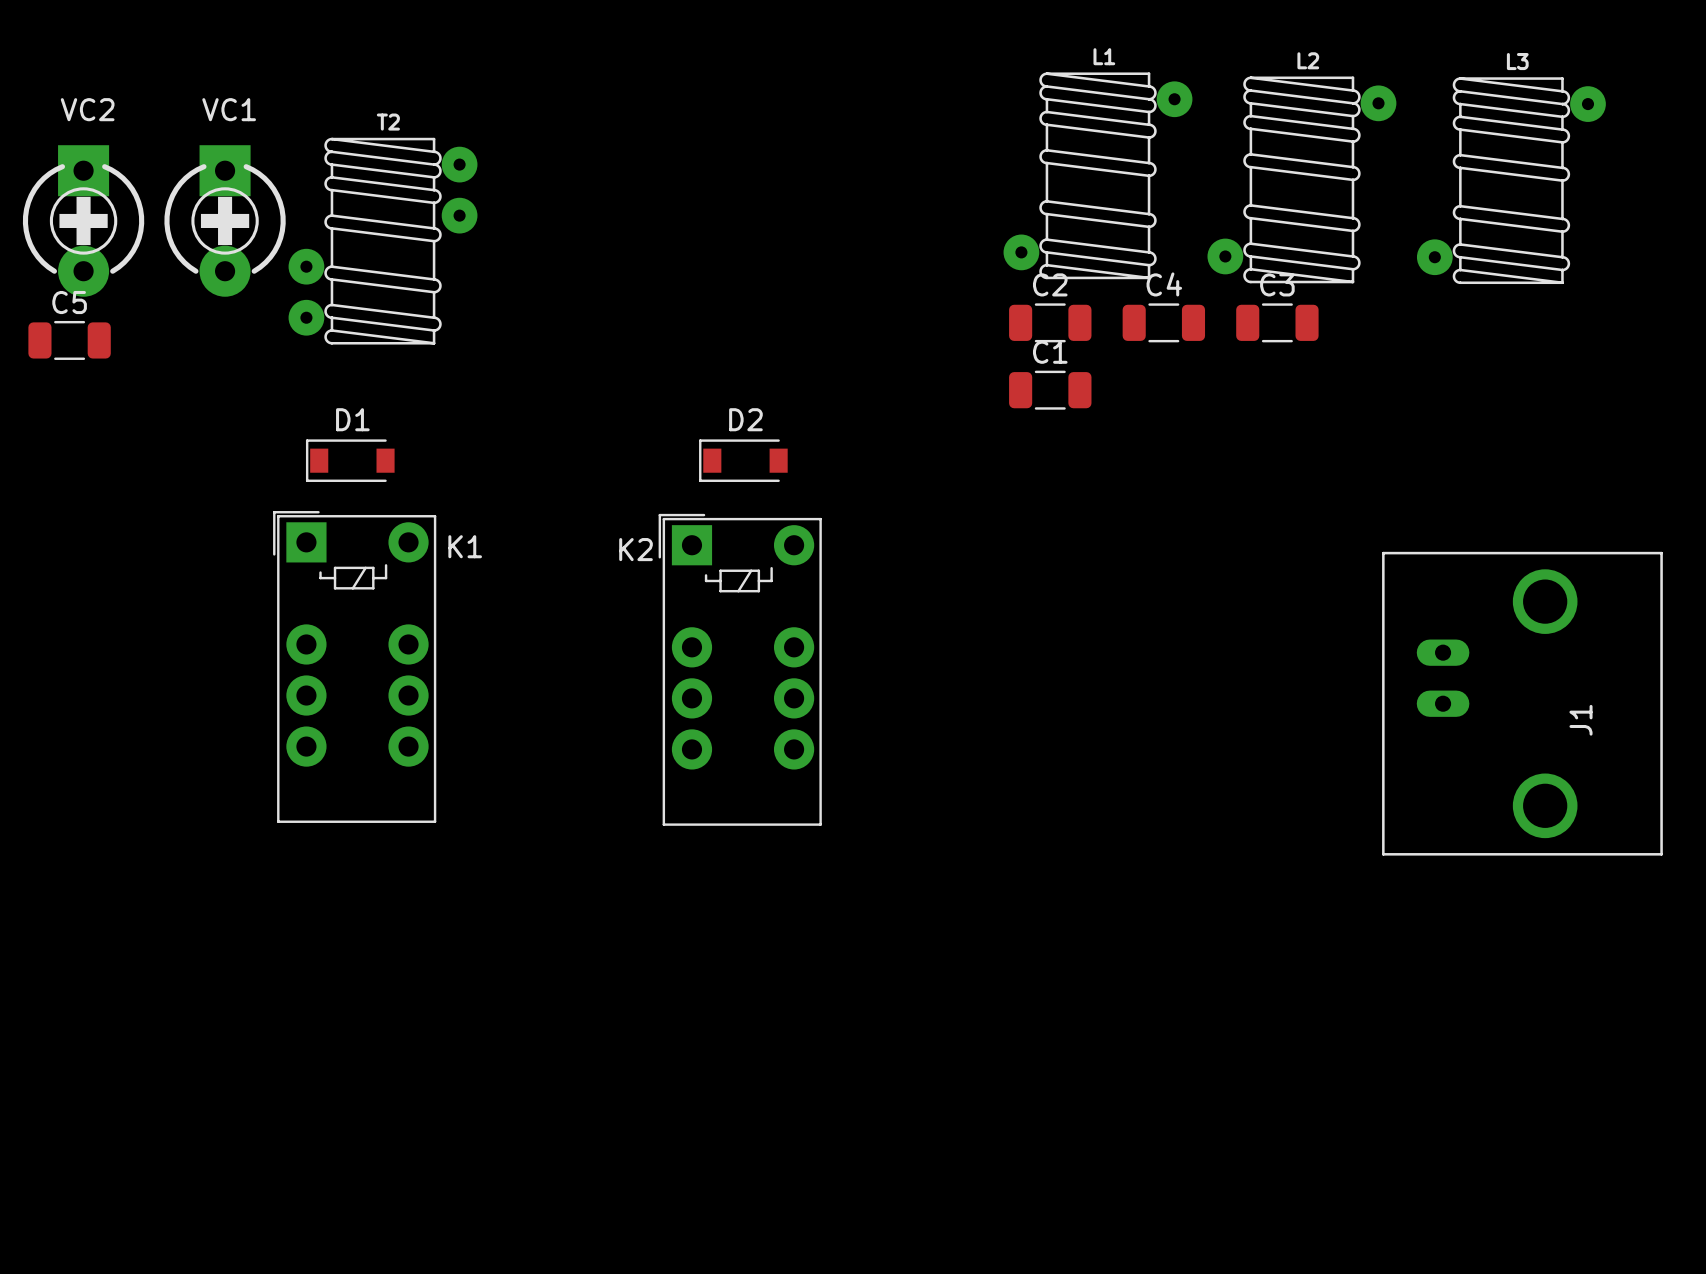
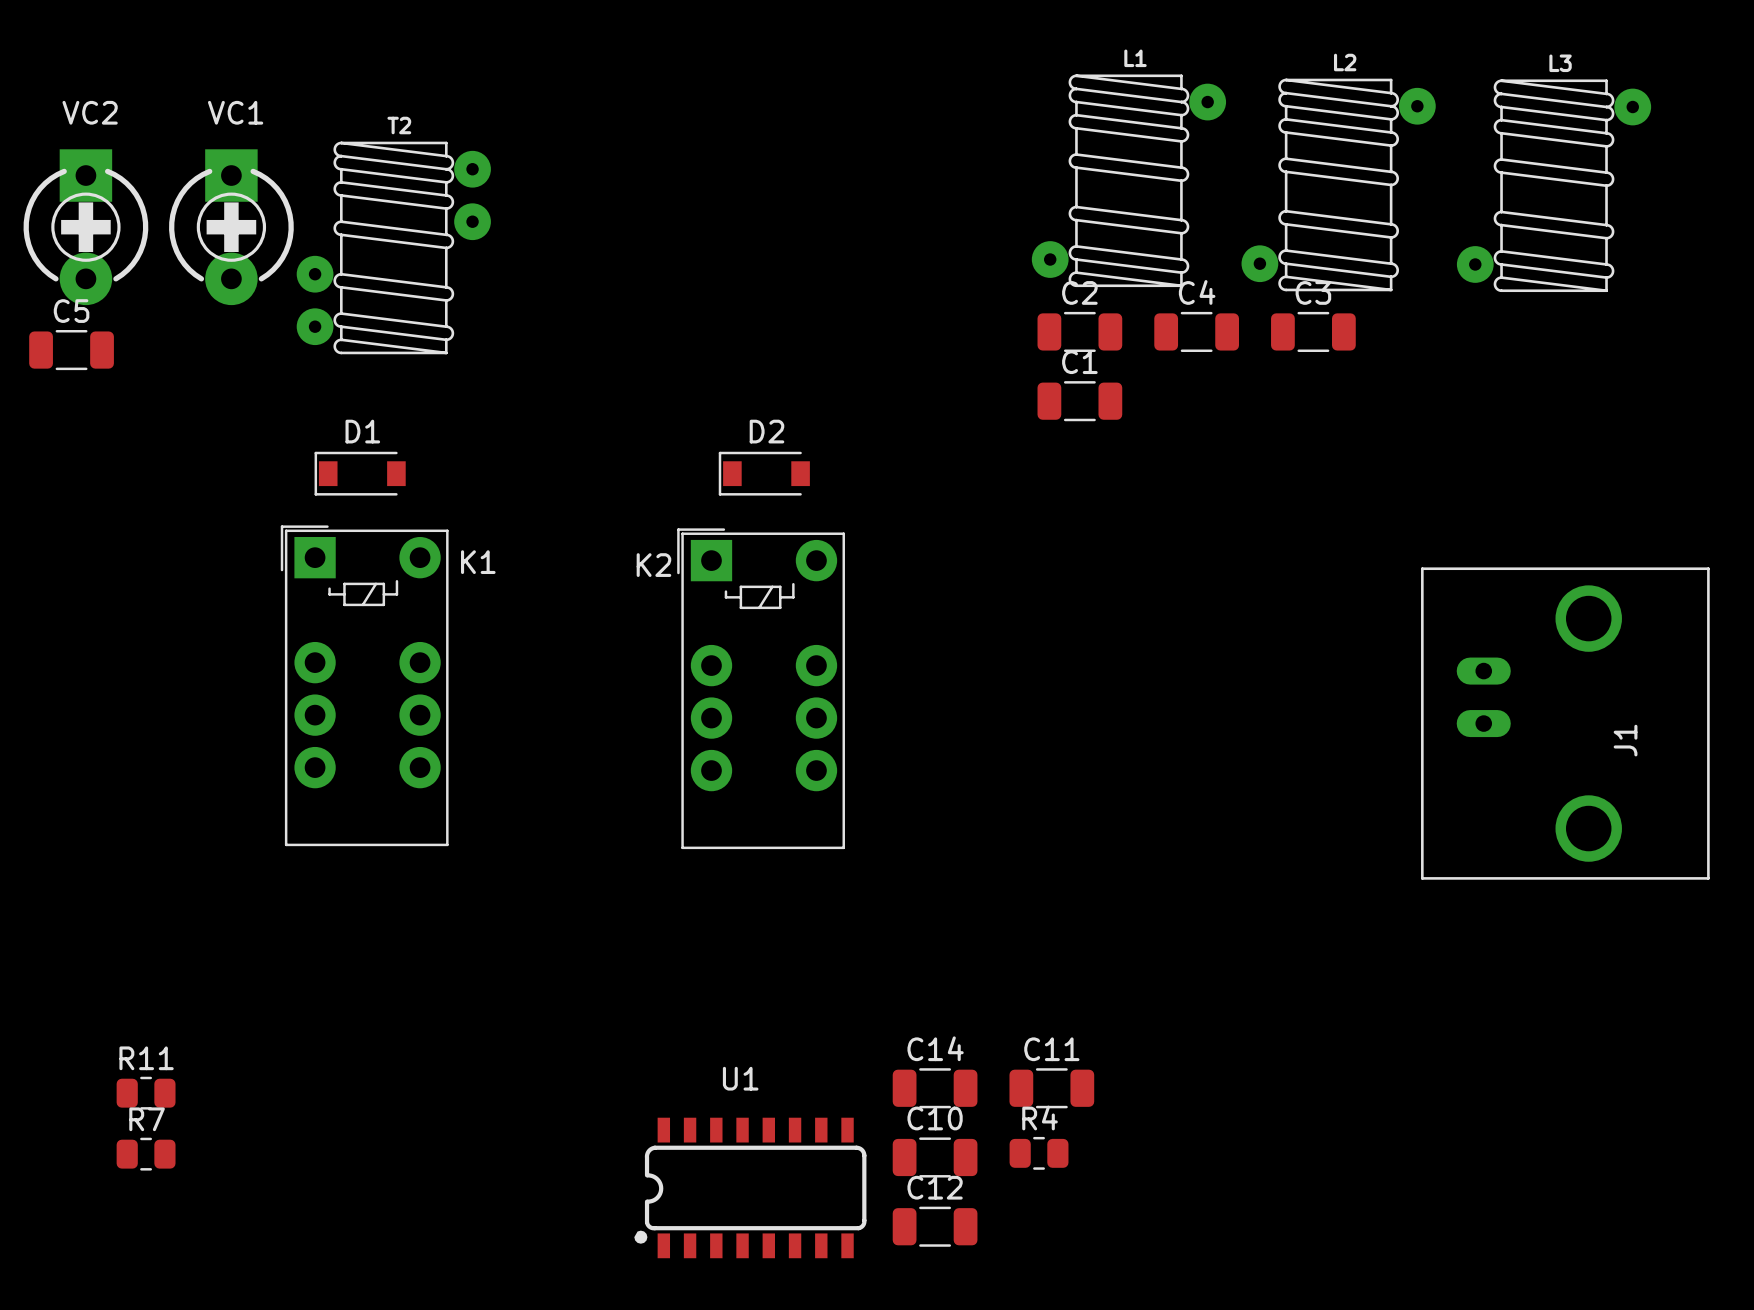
C14: none -> (935, 1088)
C11: none -> (1051, 1088)
R11: none -> (146, 1093)
R4: none -> (1039, 1153)
R7: none -> (146, 1154)
C10: none -> (935, 1157)
U1: none -> (750, 1187)
C12: none -> (935, 1226)

